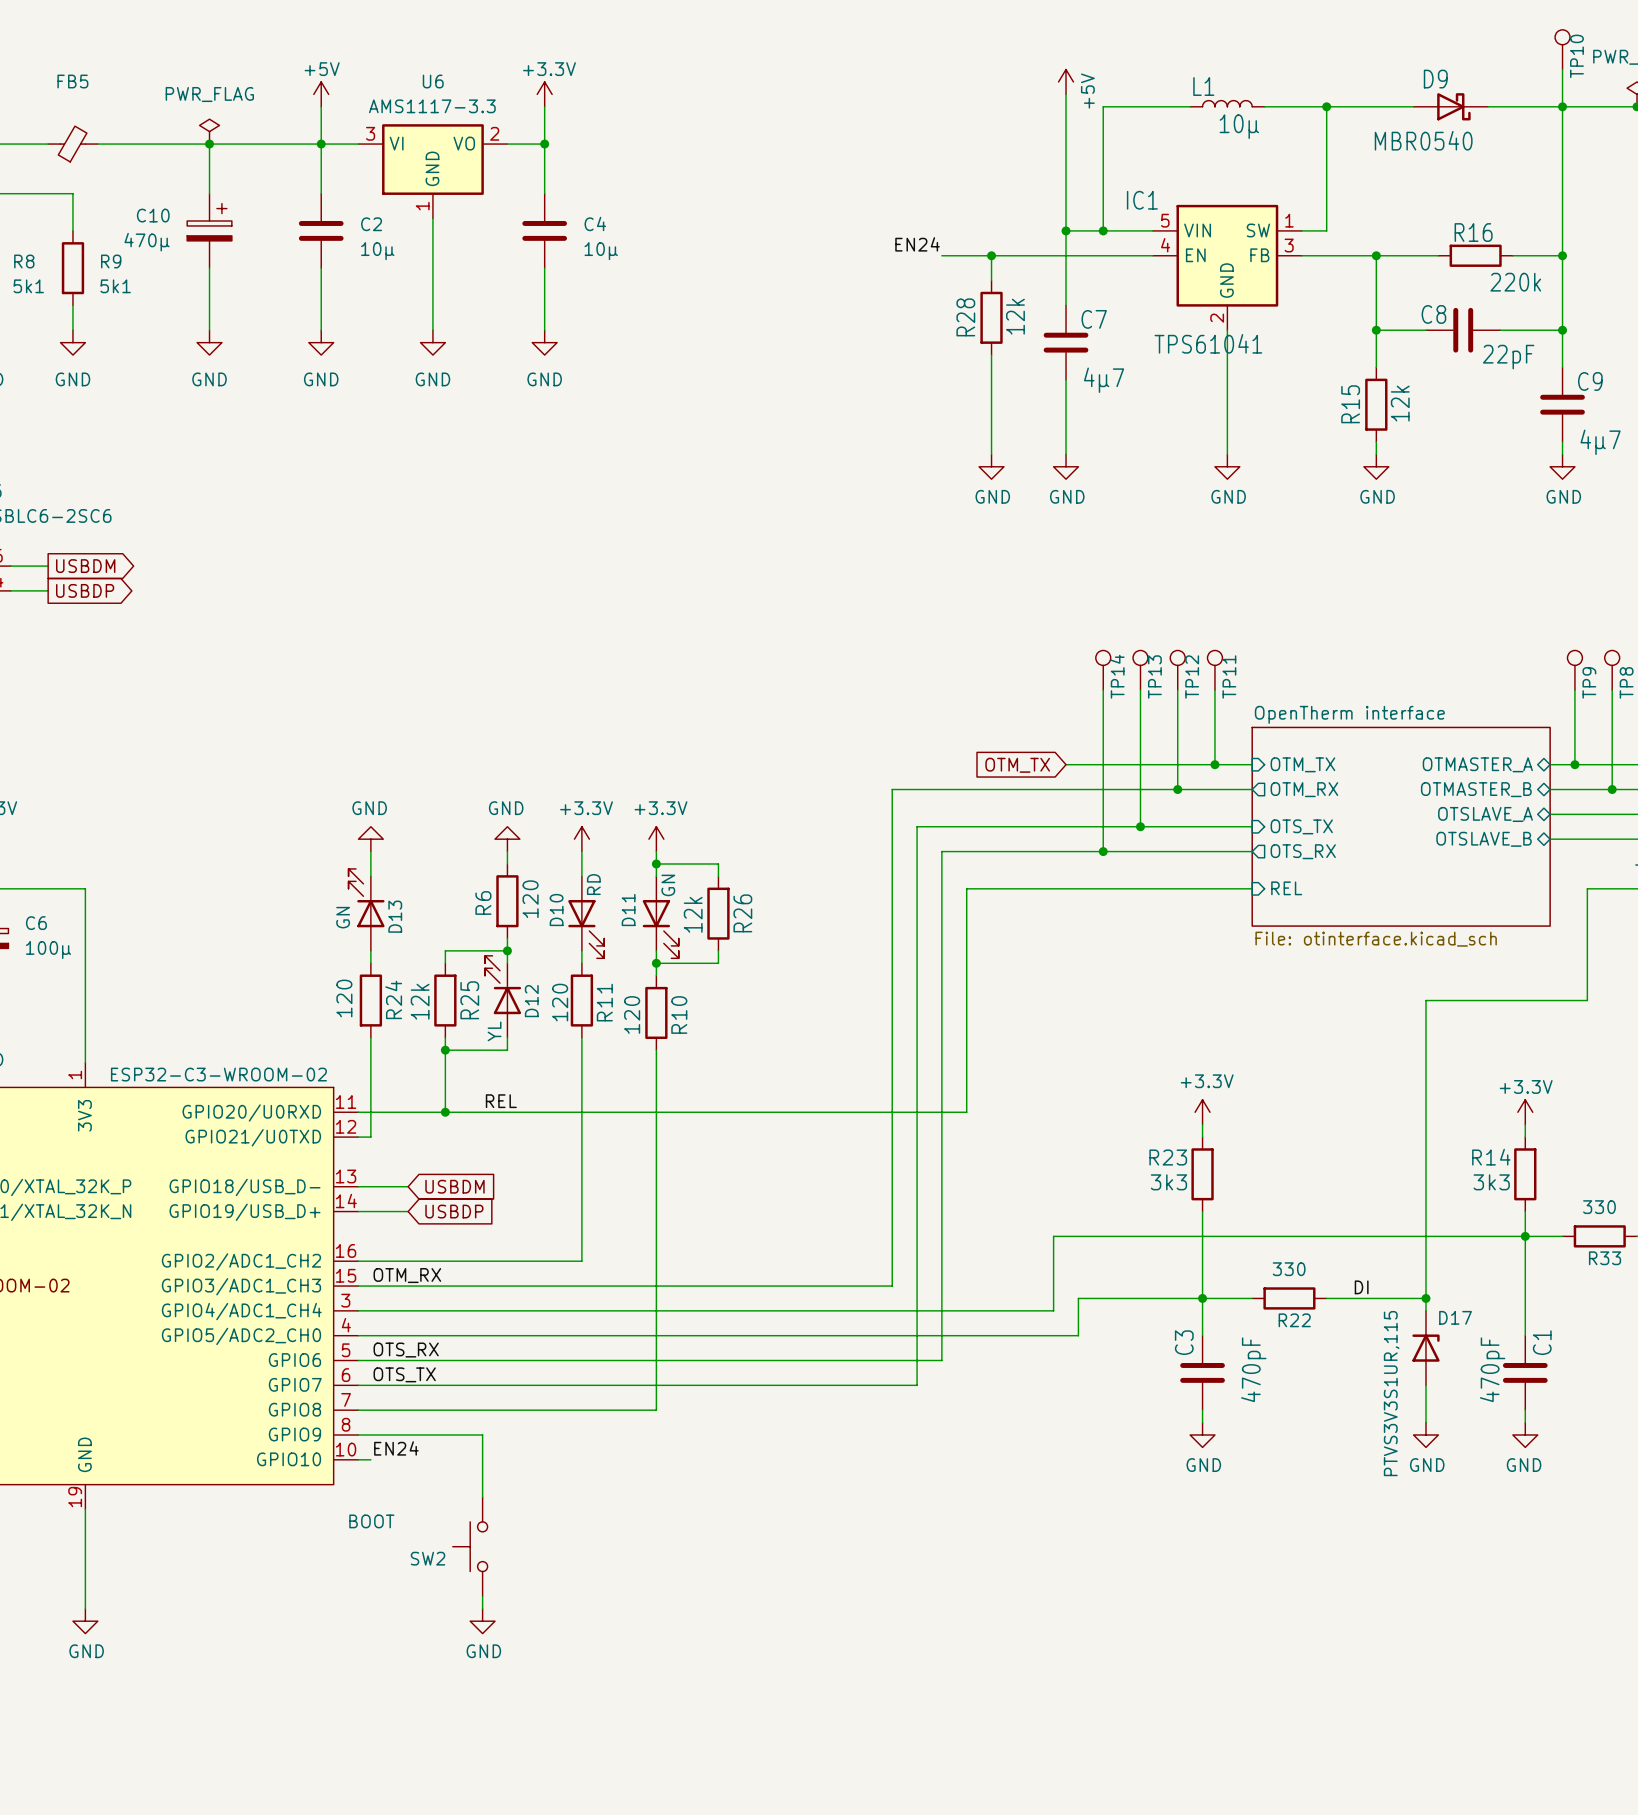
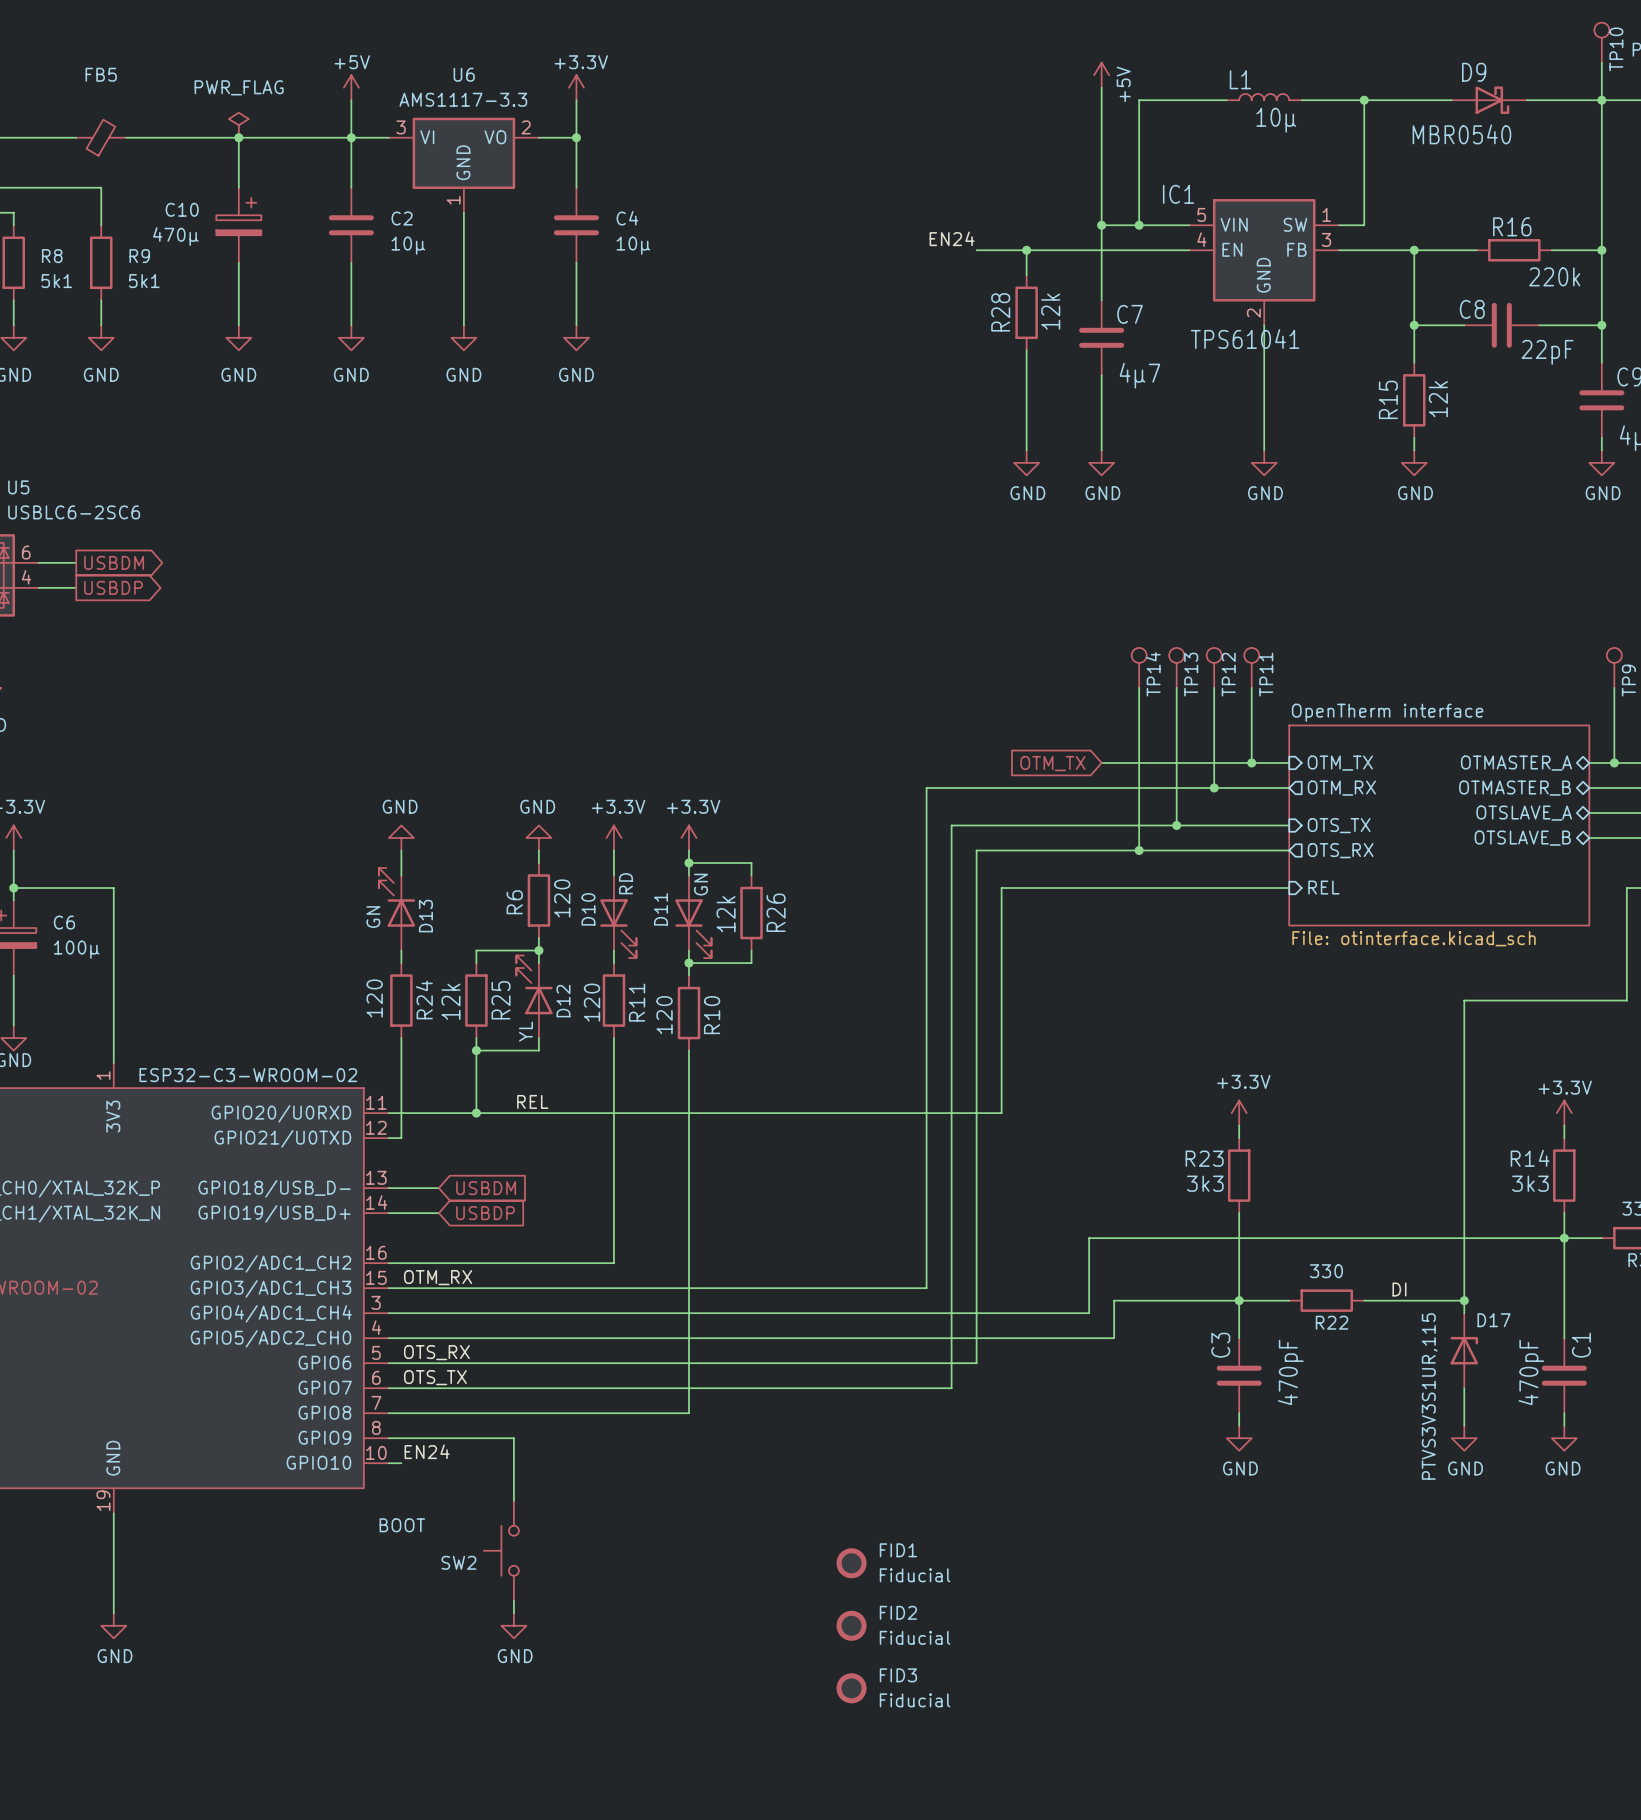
FID1: none -> Fiducial (851, 1563)
FID2: none -> Fiducial (851, 1625)
FID3: none -> Fiducial (851, 1688)

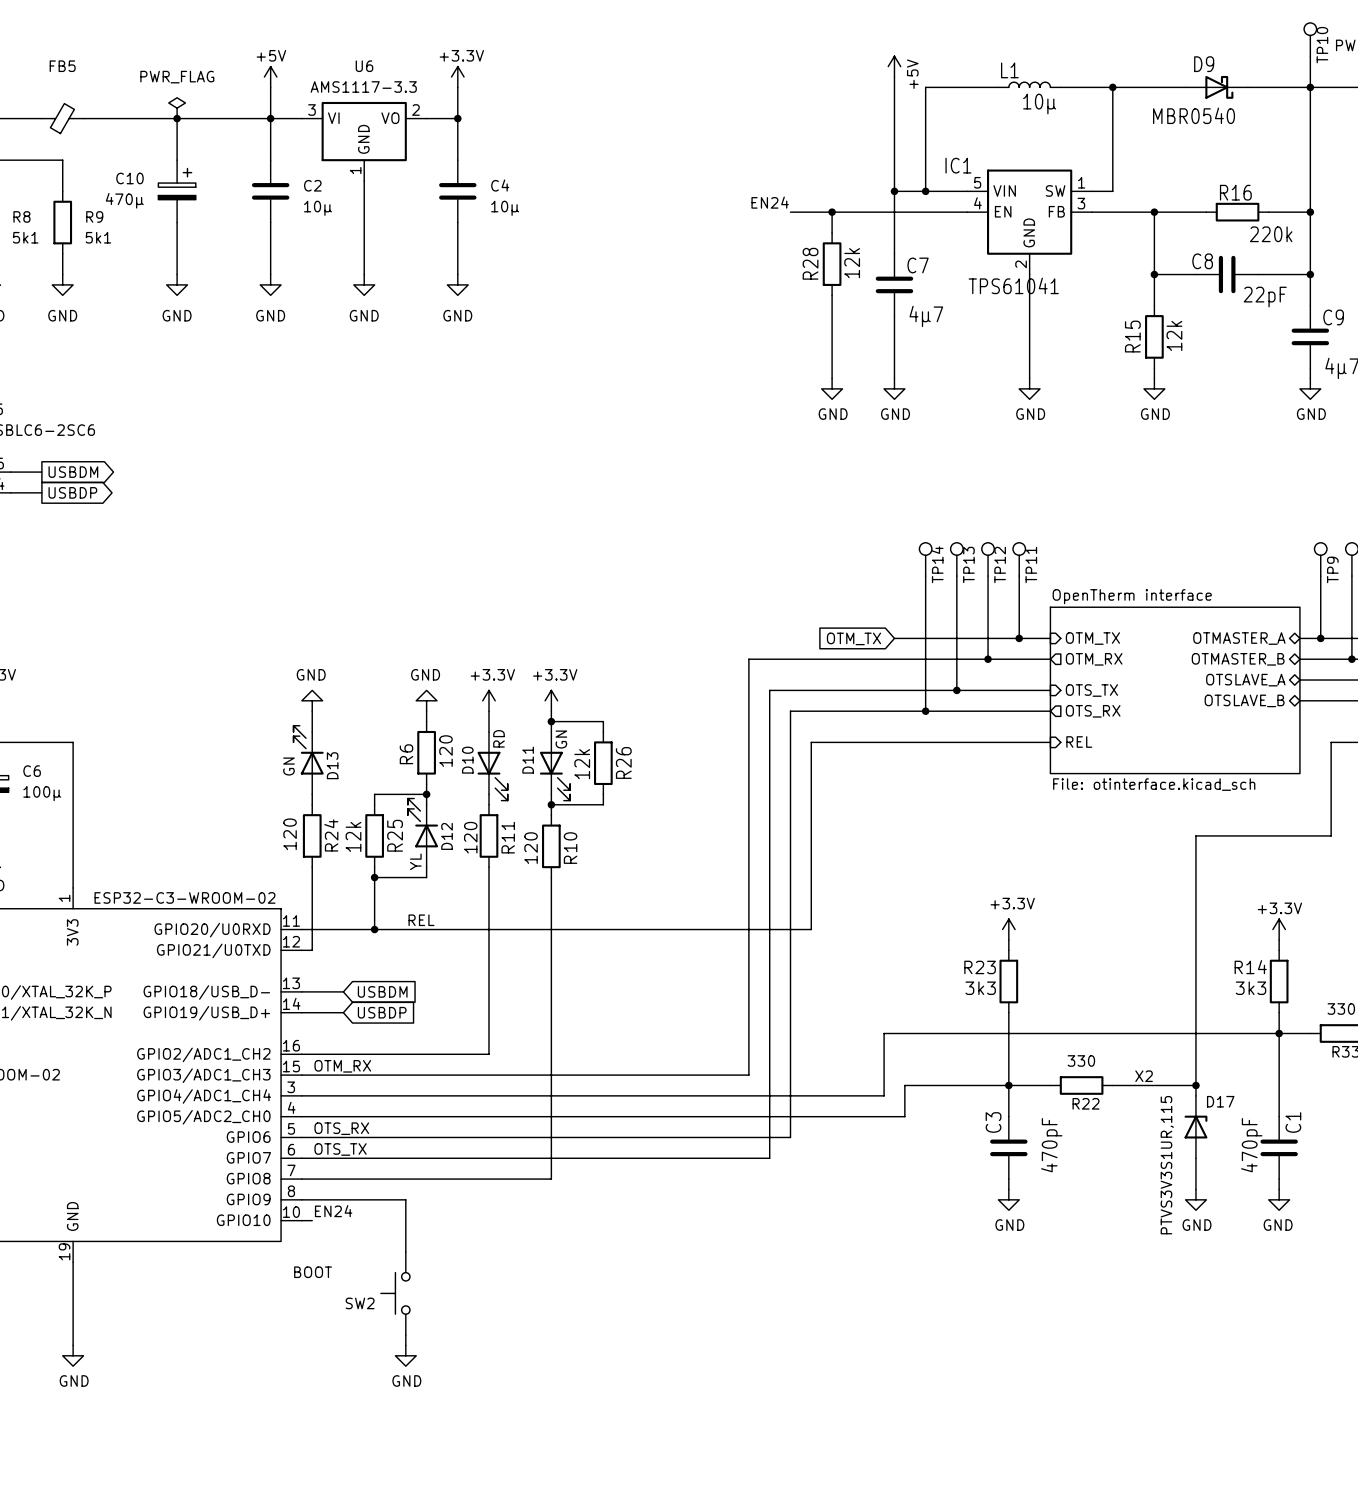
label: DI (1399, 1289) -> X2 (1144, 1076)
FID1: Fiducial (851, 1563) -> none
FID2: Fiducial (851, 1625) -> none
FID3: Fiducial (851, 1688) -> none

